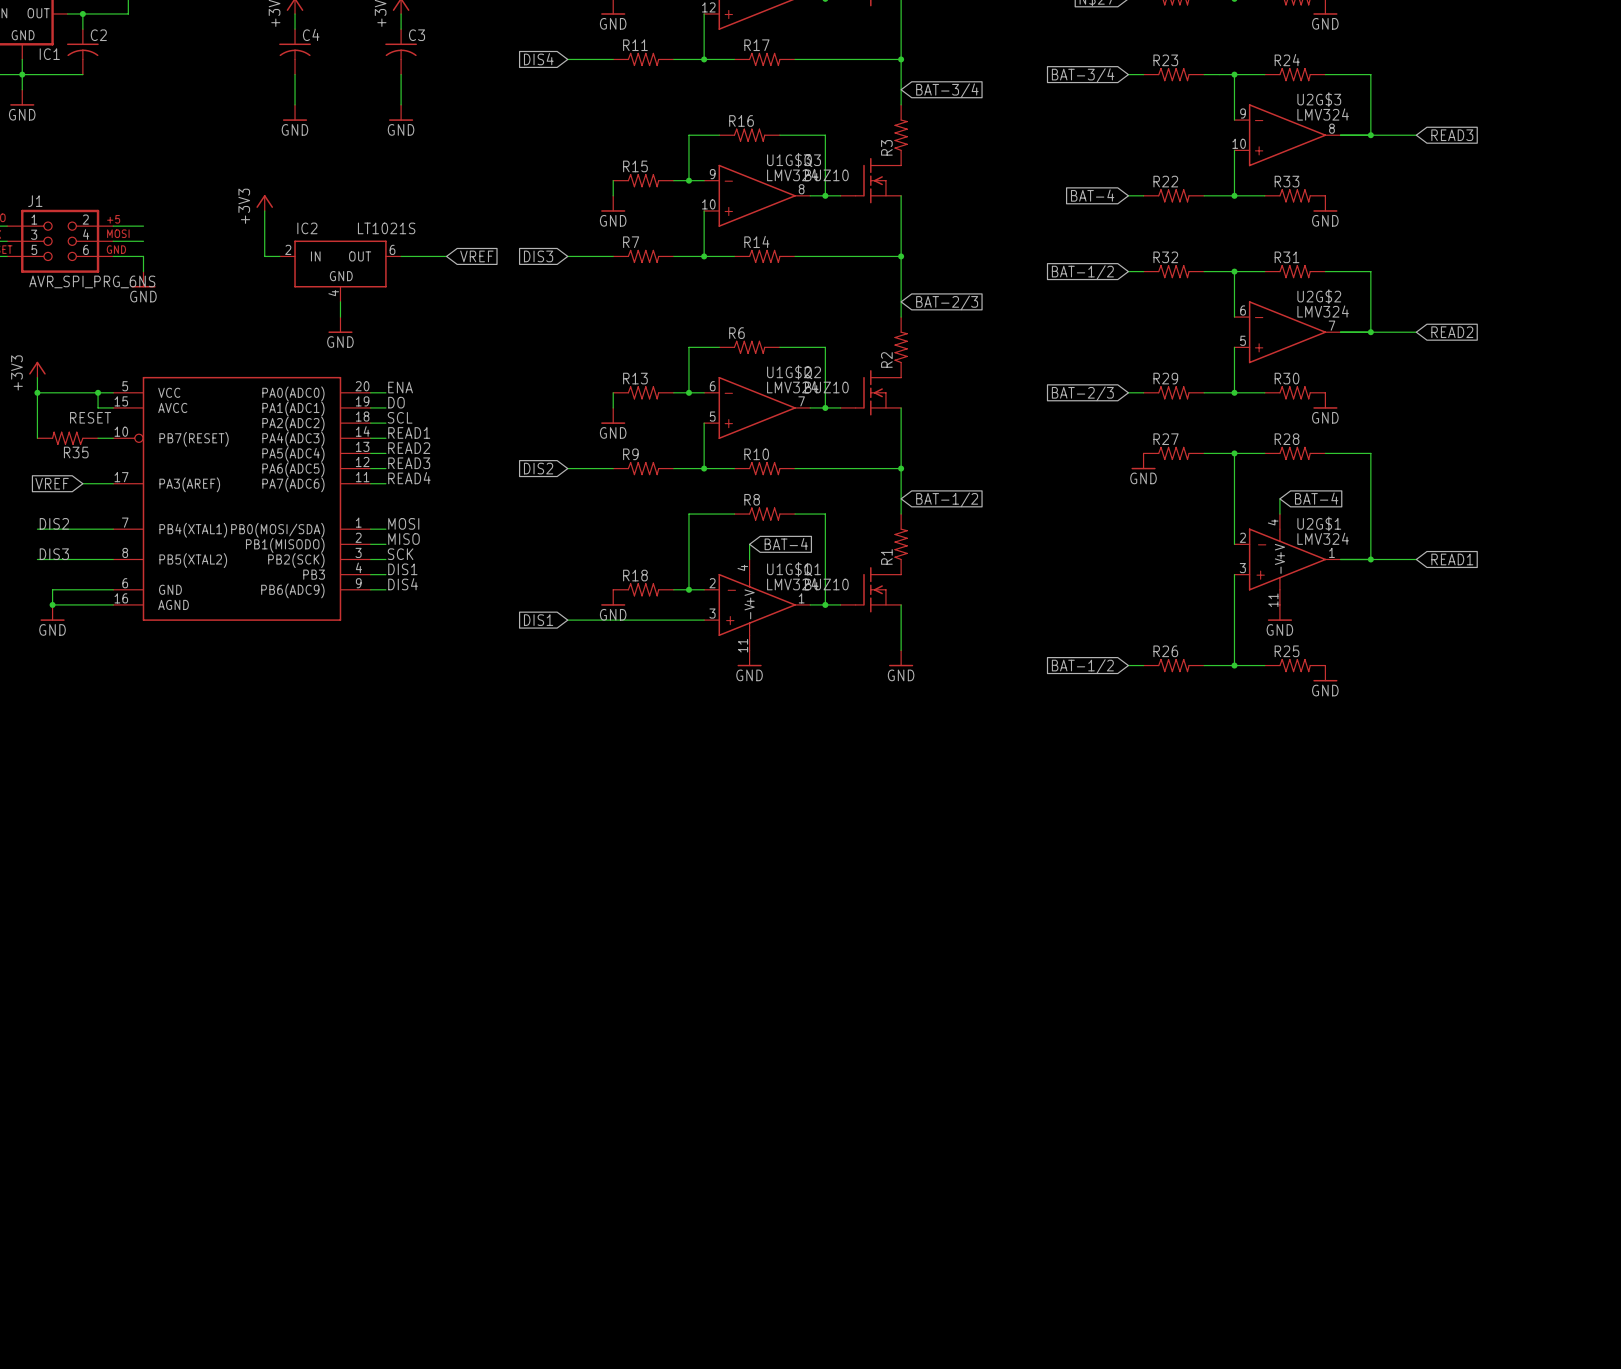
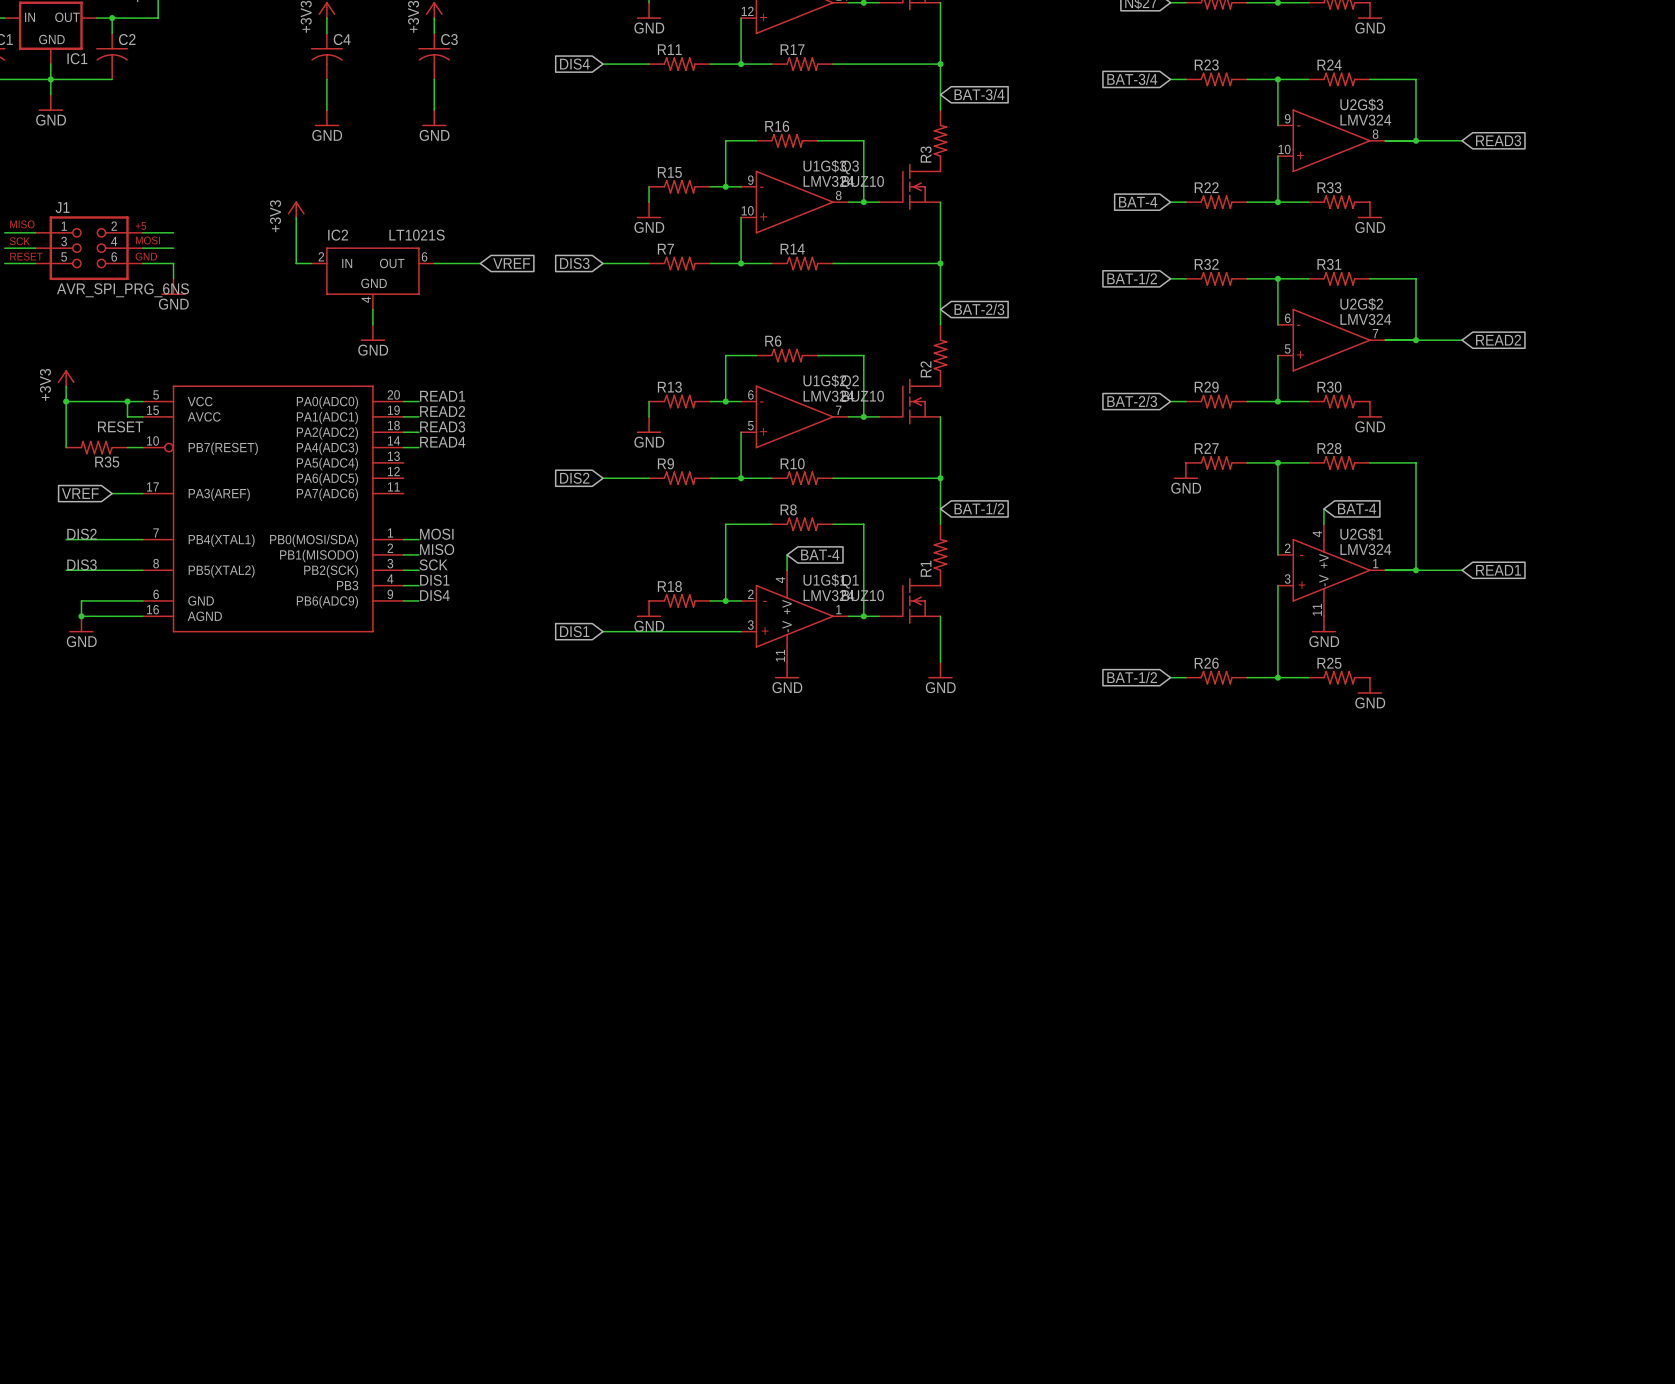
label: ENA (400, 387) -> READ1 (442, 396)
label: DO (396, 402) -> READ2 (442, 411)
label: SCL (400, 417) -> READ3 (442, 426)
label: READ1 (409, 432) -> READ4 (442, 442)
label: READ2 (409, 448) -> none
wire: (370, 453) (385, 453) -> none
label: READ3 (409, 463) -> none
wire: (370, 468) (385, 468) -> none
label: READ4 (409, 478) -> none
wire: (370, 483) (385, 483) -> none

